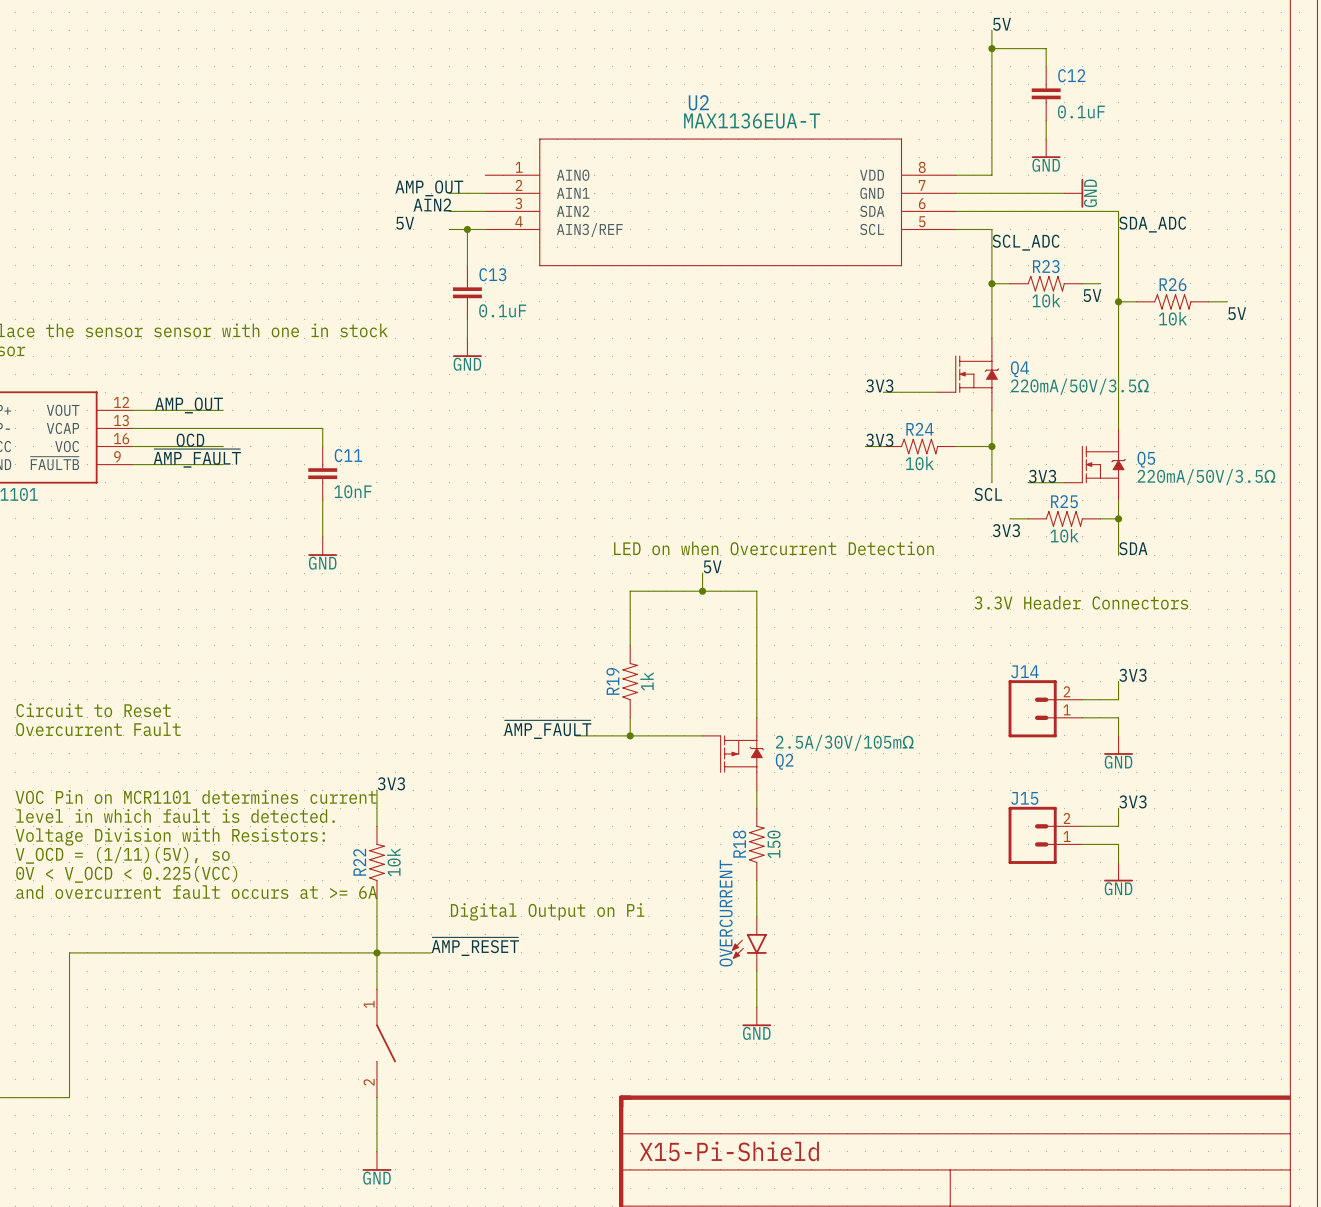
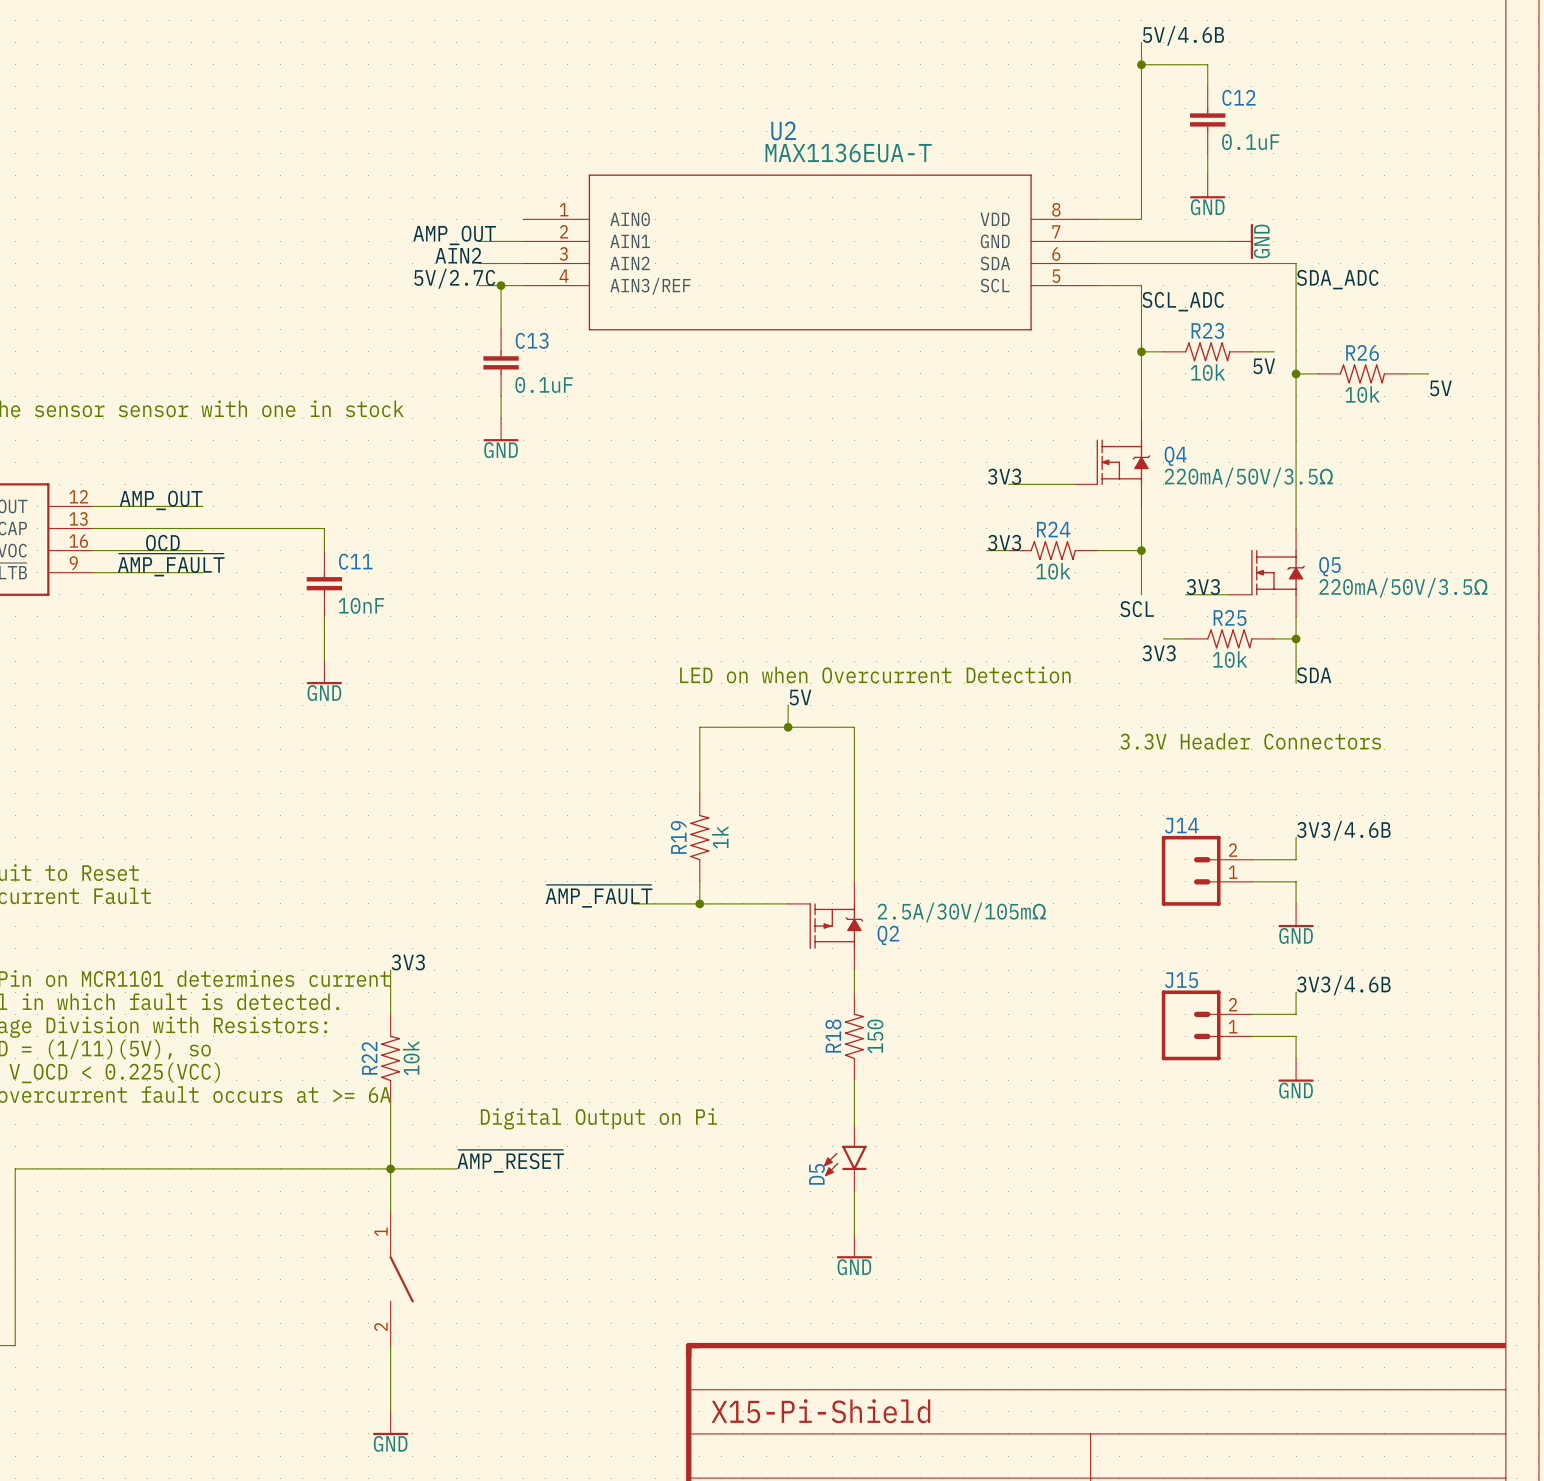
label: 5V (1002, 24) -> 5V/4.6B (1183, 35)
label: 5V (405, 223) -> 5V/2.7C (454, 278)
label: 3V3 (1132, 675) -> 3V3/4.6B (1343, 830)
label: 3V3 (1132, 801) -> 3V3/4.6B (1343, 985)
OVERCURRENT name: OVERCURRENT (726, 913) -> D5 (816, 1174)

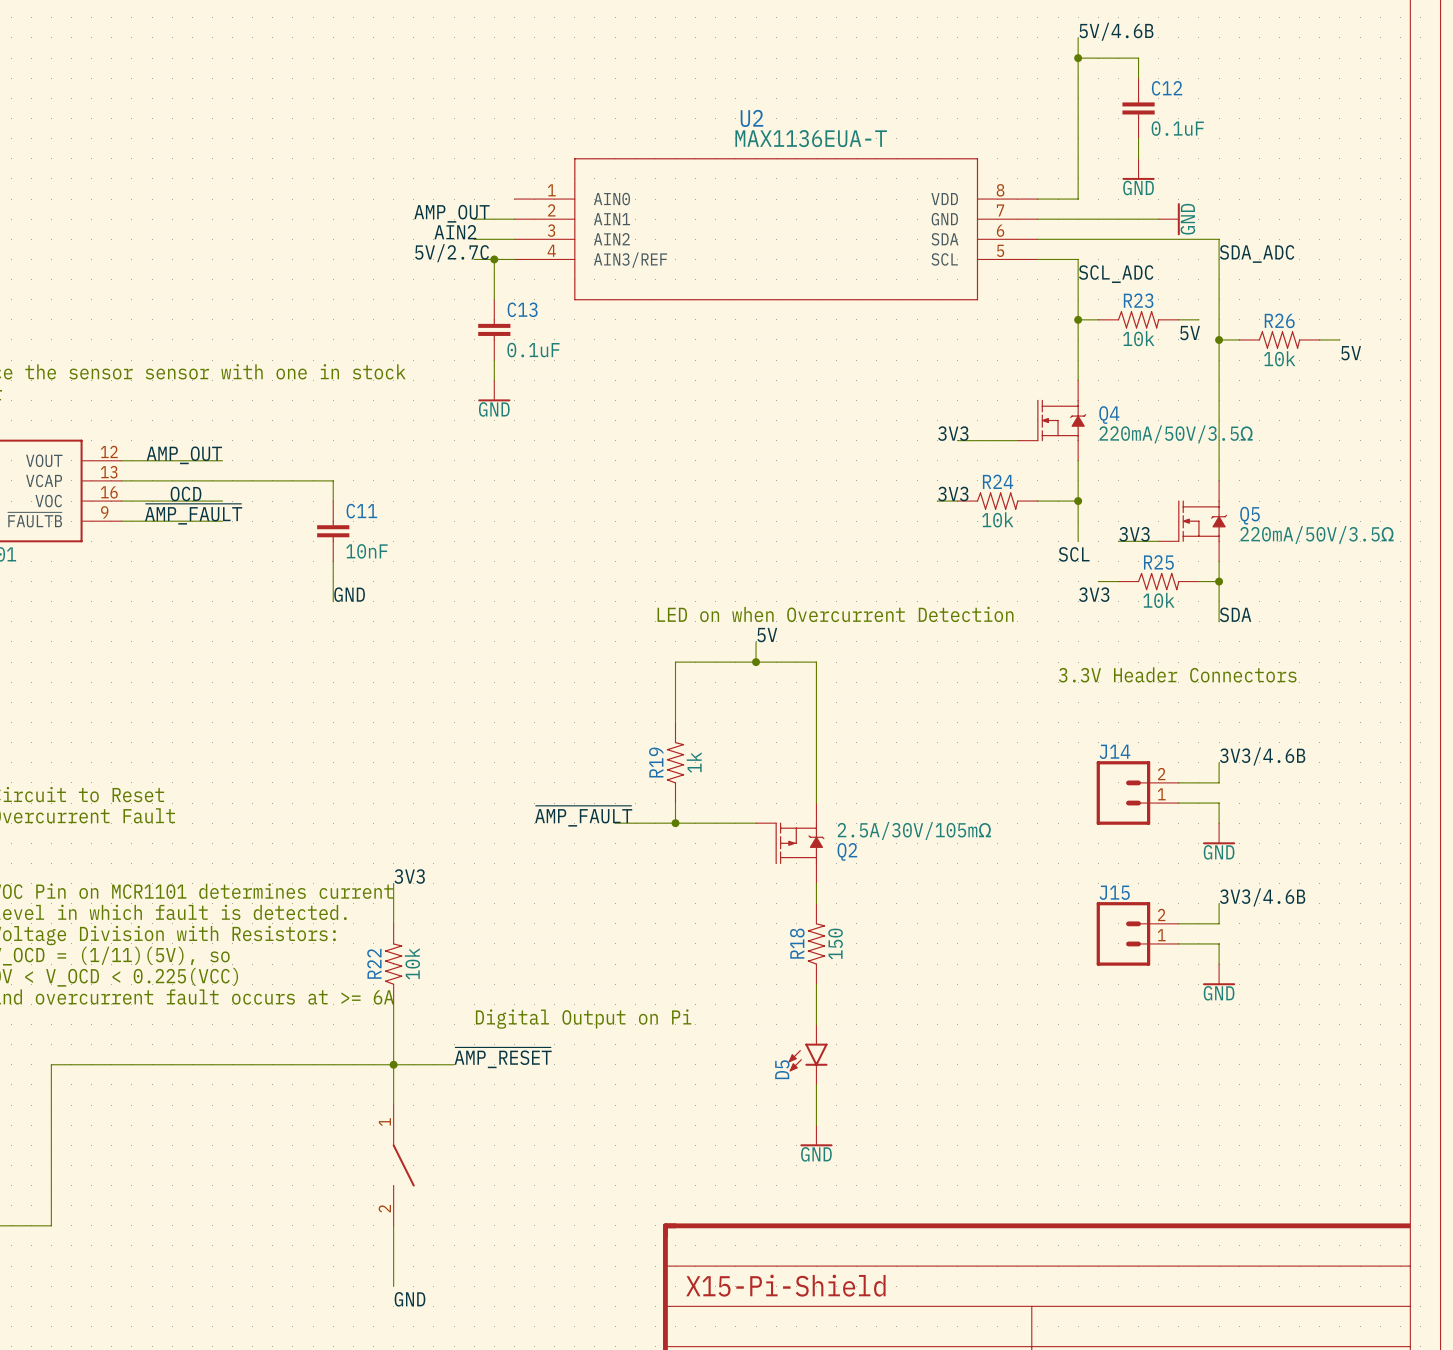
label: none -> GND (349, 594)
power symbol: GND (324, 672) -> none
power symbol: GND (390, 1423) -> none
label: none -> GND (409, 1299)

